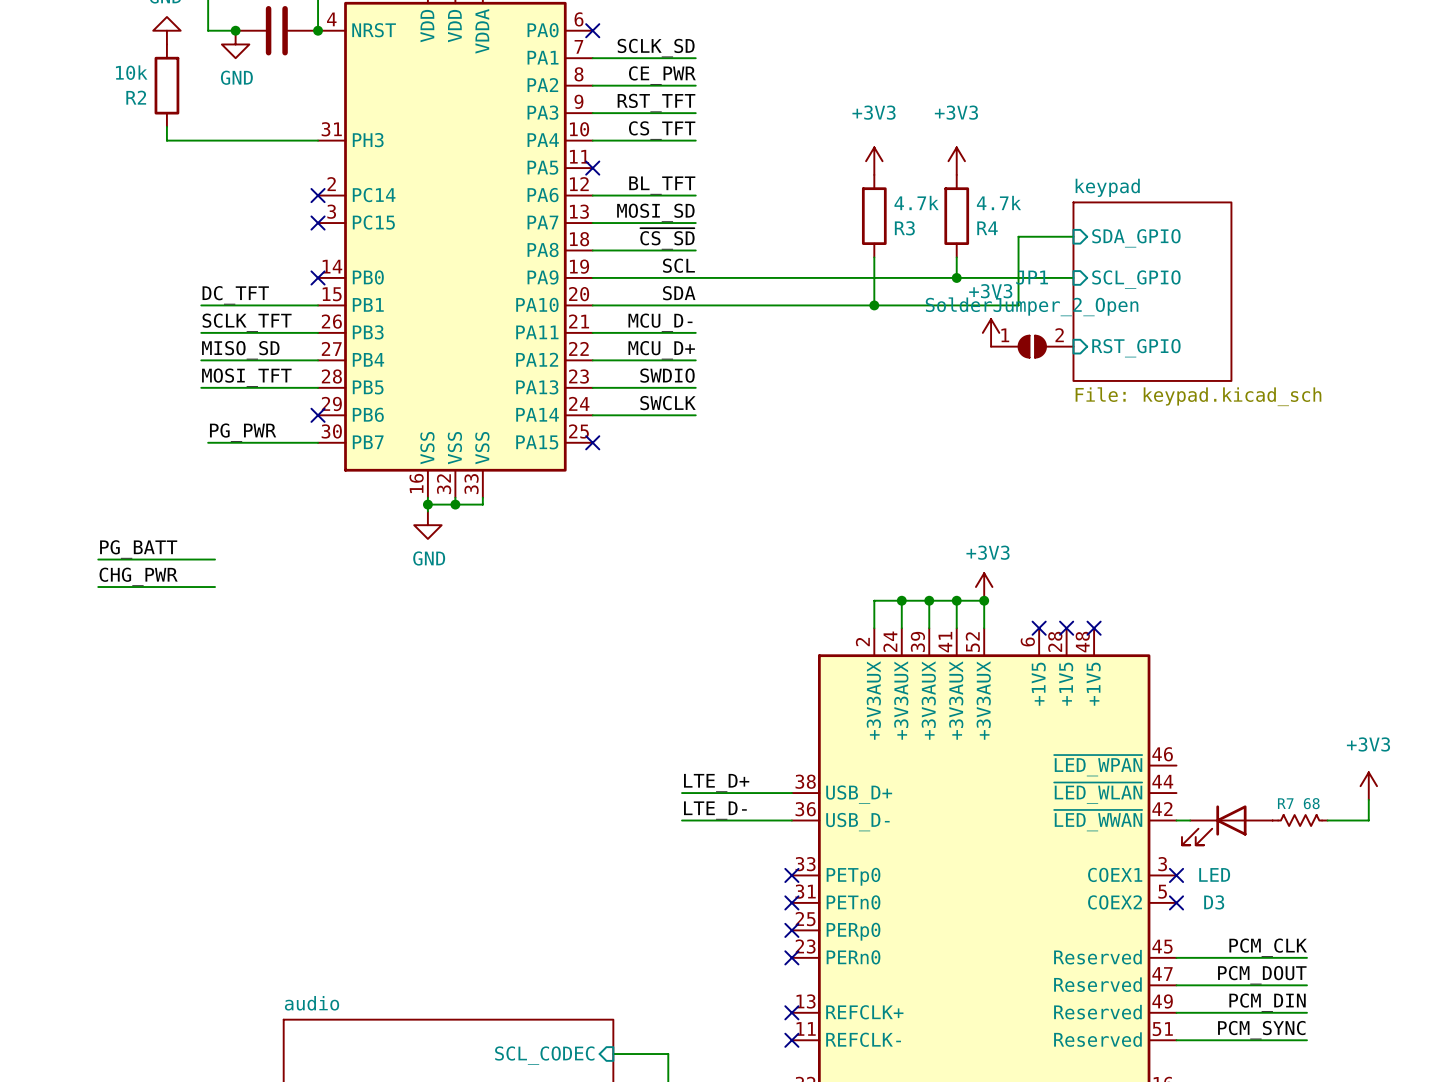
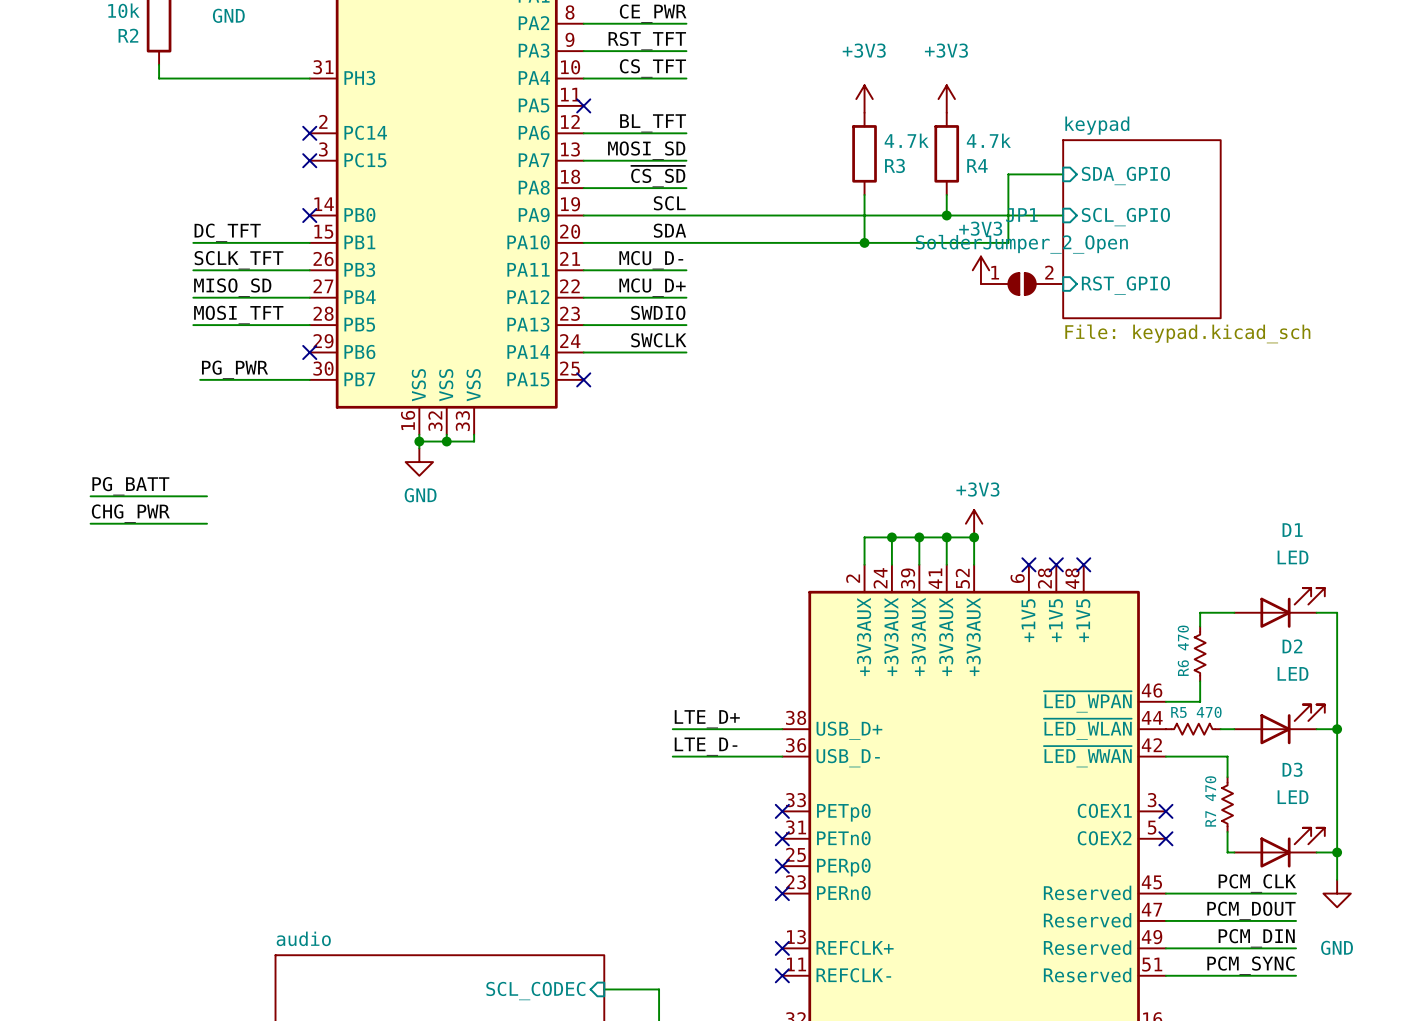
D1: none -> LED (1279, 607)
wire: none -> (1234, 612) (1200, 612) (1200, 626)
wire: none -> (1316, 612) (1337, 612) (1337, 879)
R6: none -> 470 (1200, 653)
wire: none -> (1200, 681) (1200, 701) (1165, 701)
power symbol: +3V3 (1368, 786) -> none
D2: none -> LED (1279, 724)
R5: none -> 470 (1193, 729)
wire: none -> (1220, 729) (1234, 729)
wire: none -> (1316, 729) (1337, 729)
junction: none -> (1337, 729)
wire: (1368, 799) (1368, 820) (1327, 820) -> none
R7 value: 68 (1311, 803) -> 470 (1210, 788)
R7 rotation: 0° (1300, 820) -> 90° counterclockwise (1227, 804)
R7 position: (1300, 820) -> (1227, 804)
D3 rotation: 0° (1214, 825) -> 180° (1292, 847)
D3 position: (1227, 825) -> (1279, 847)
wire: none -> (1227, 831) (1227, 852) (1234, 852)
wire: none -> (1316, 852) (1337, 852)
junction: none -> (1337, 852)
power symbol: none -> GND (1337, 893)

